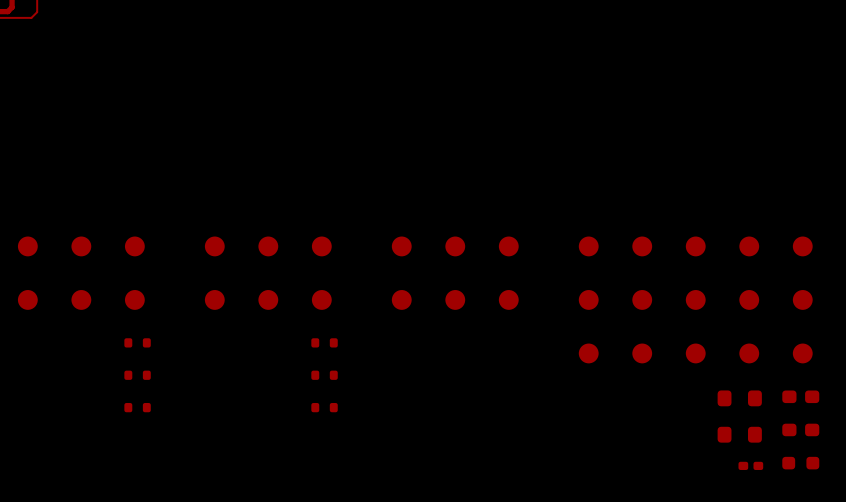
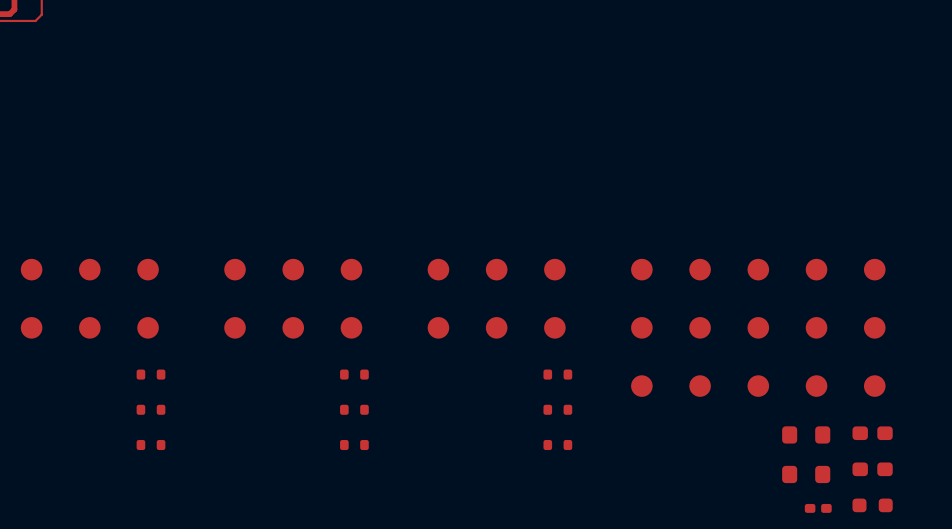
part: none -> (557, 374)
part: none -> (557, 409)
part: none -> (557, 445)

